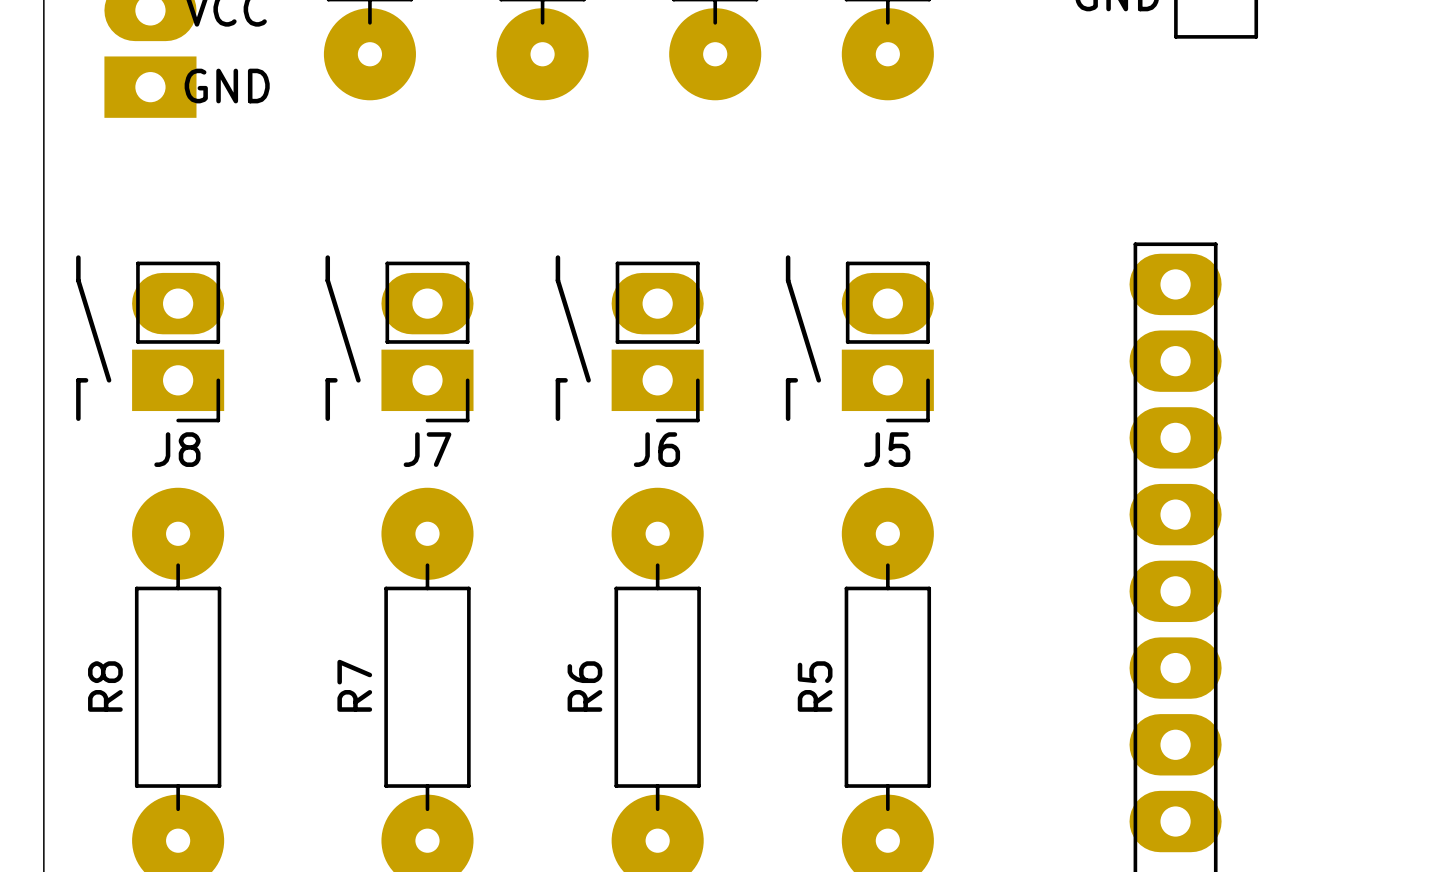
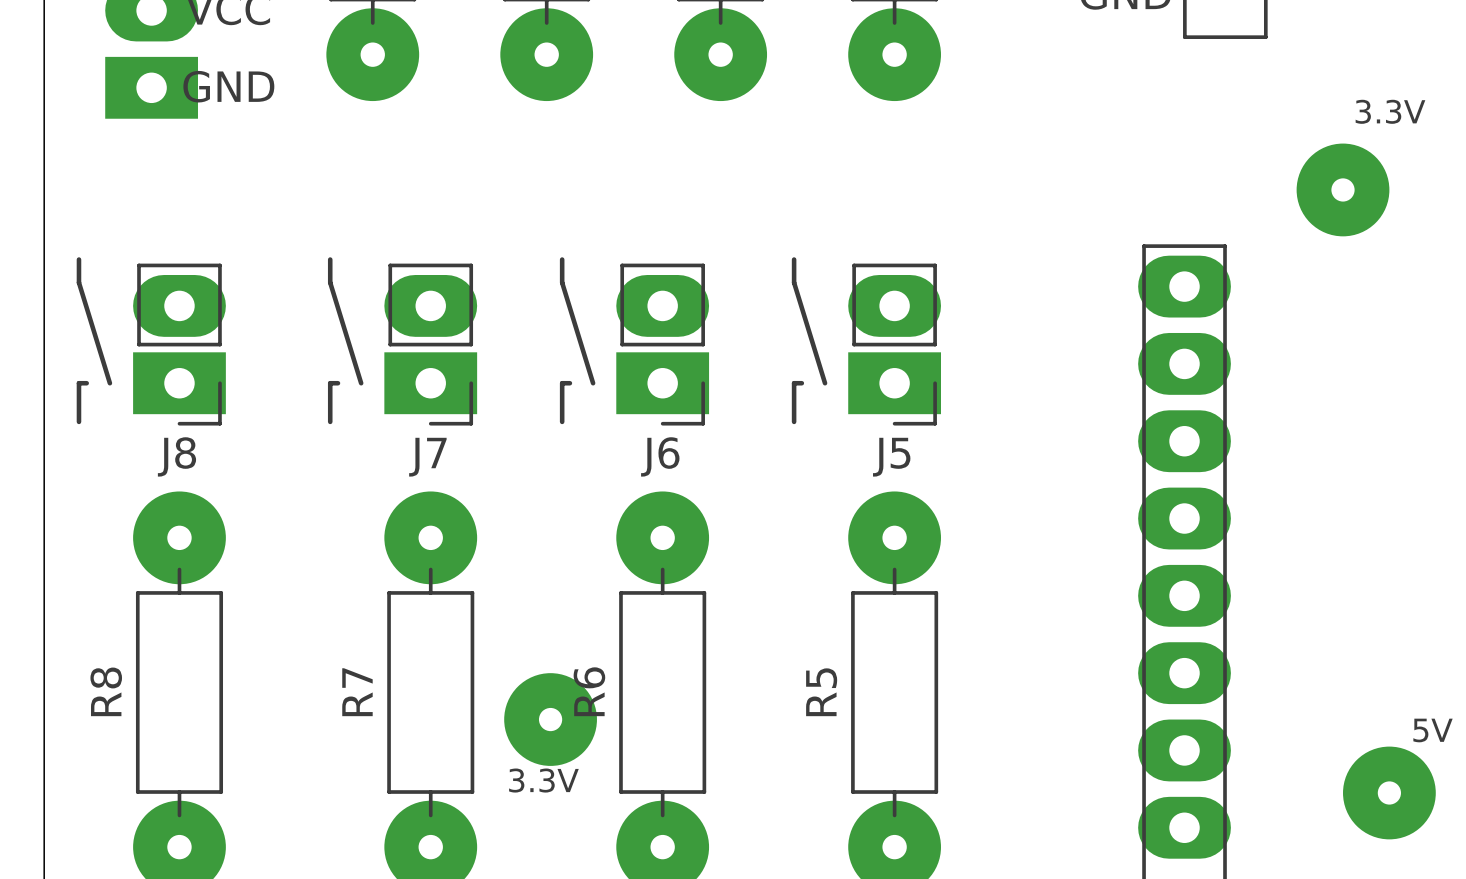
text: none -> 3.3V (1390, 111)
via: none -> (1343, 189)
via: none -> (550, 719)
text: none -> 5V (1433, 730)
text: none -> 3.3V (543, 780)
via: none -> (1389, 792)

